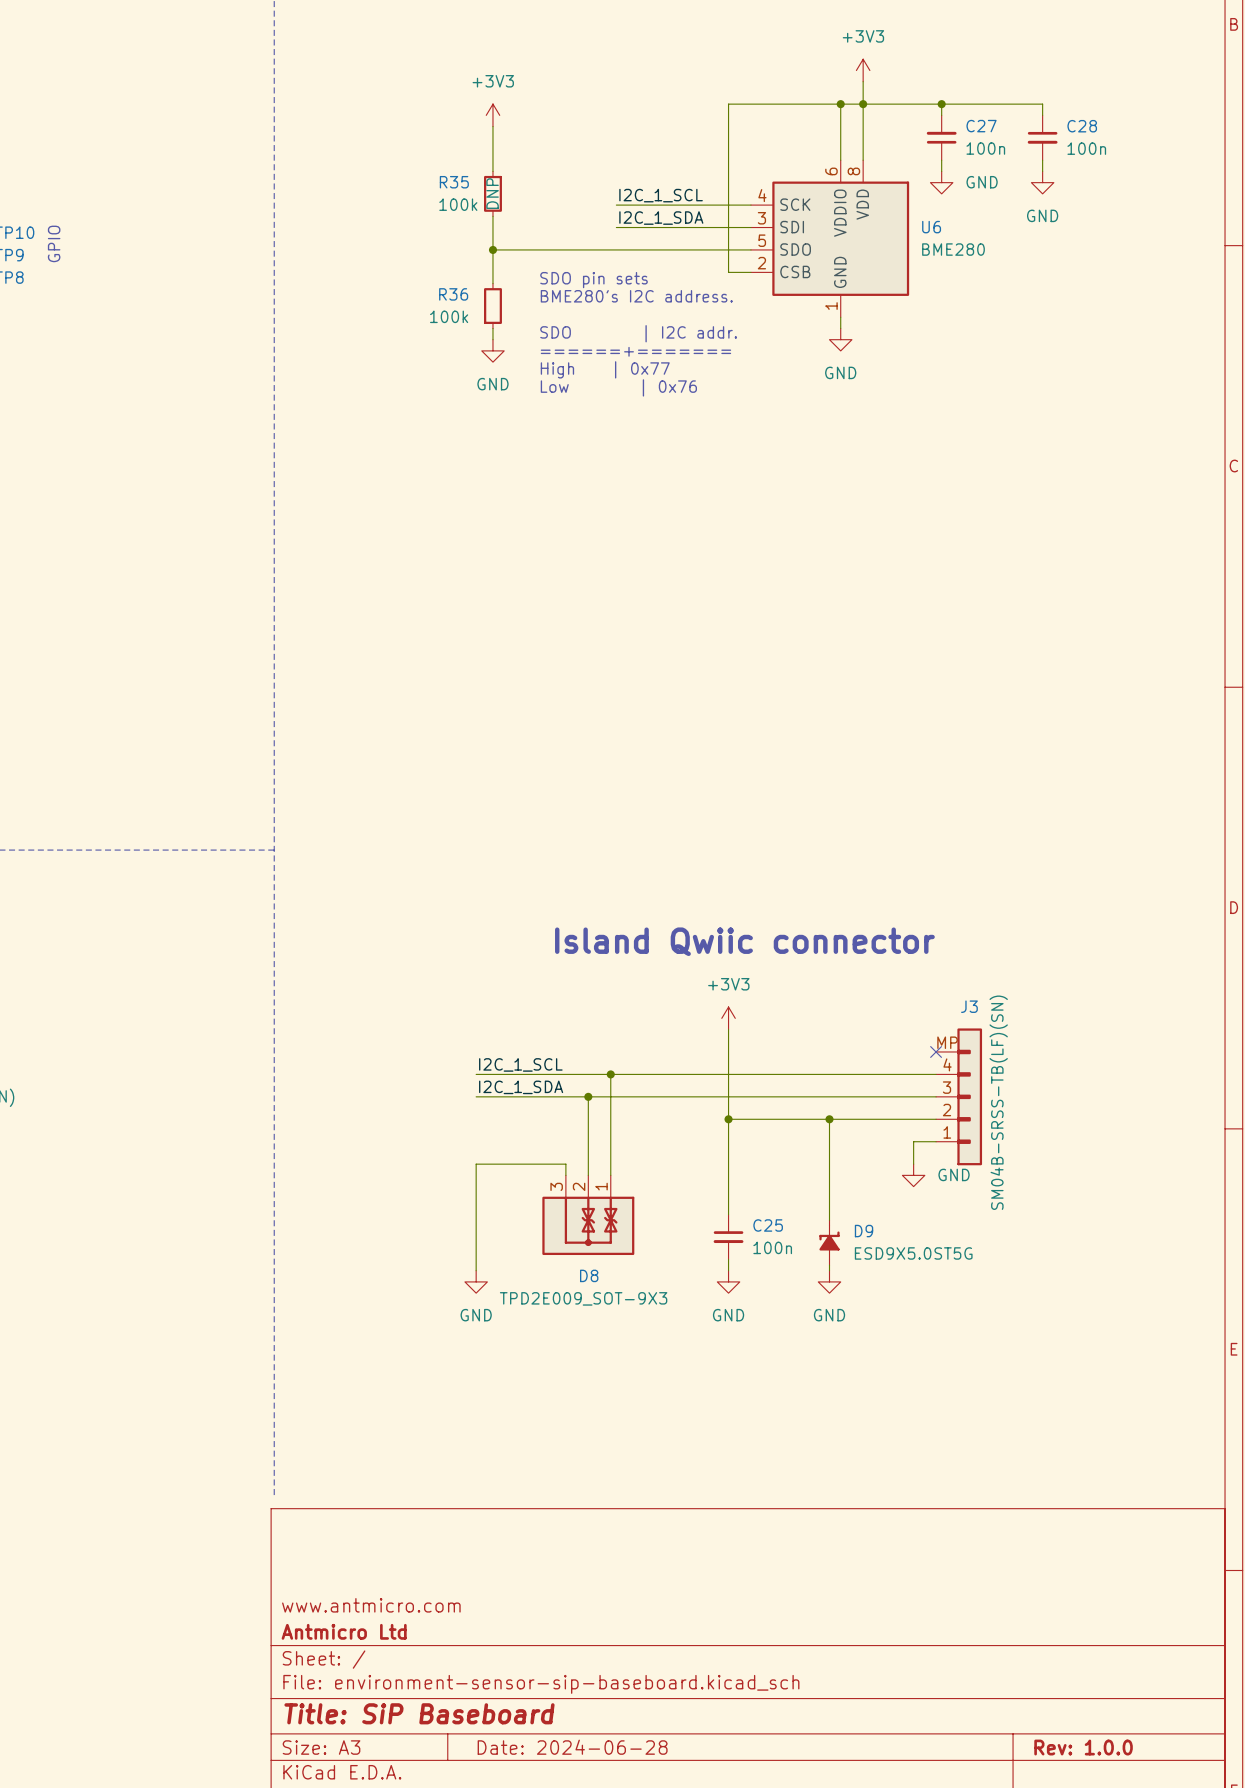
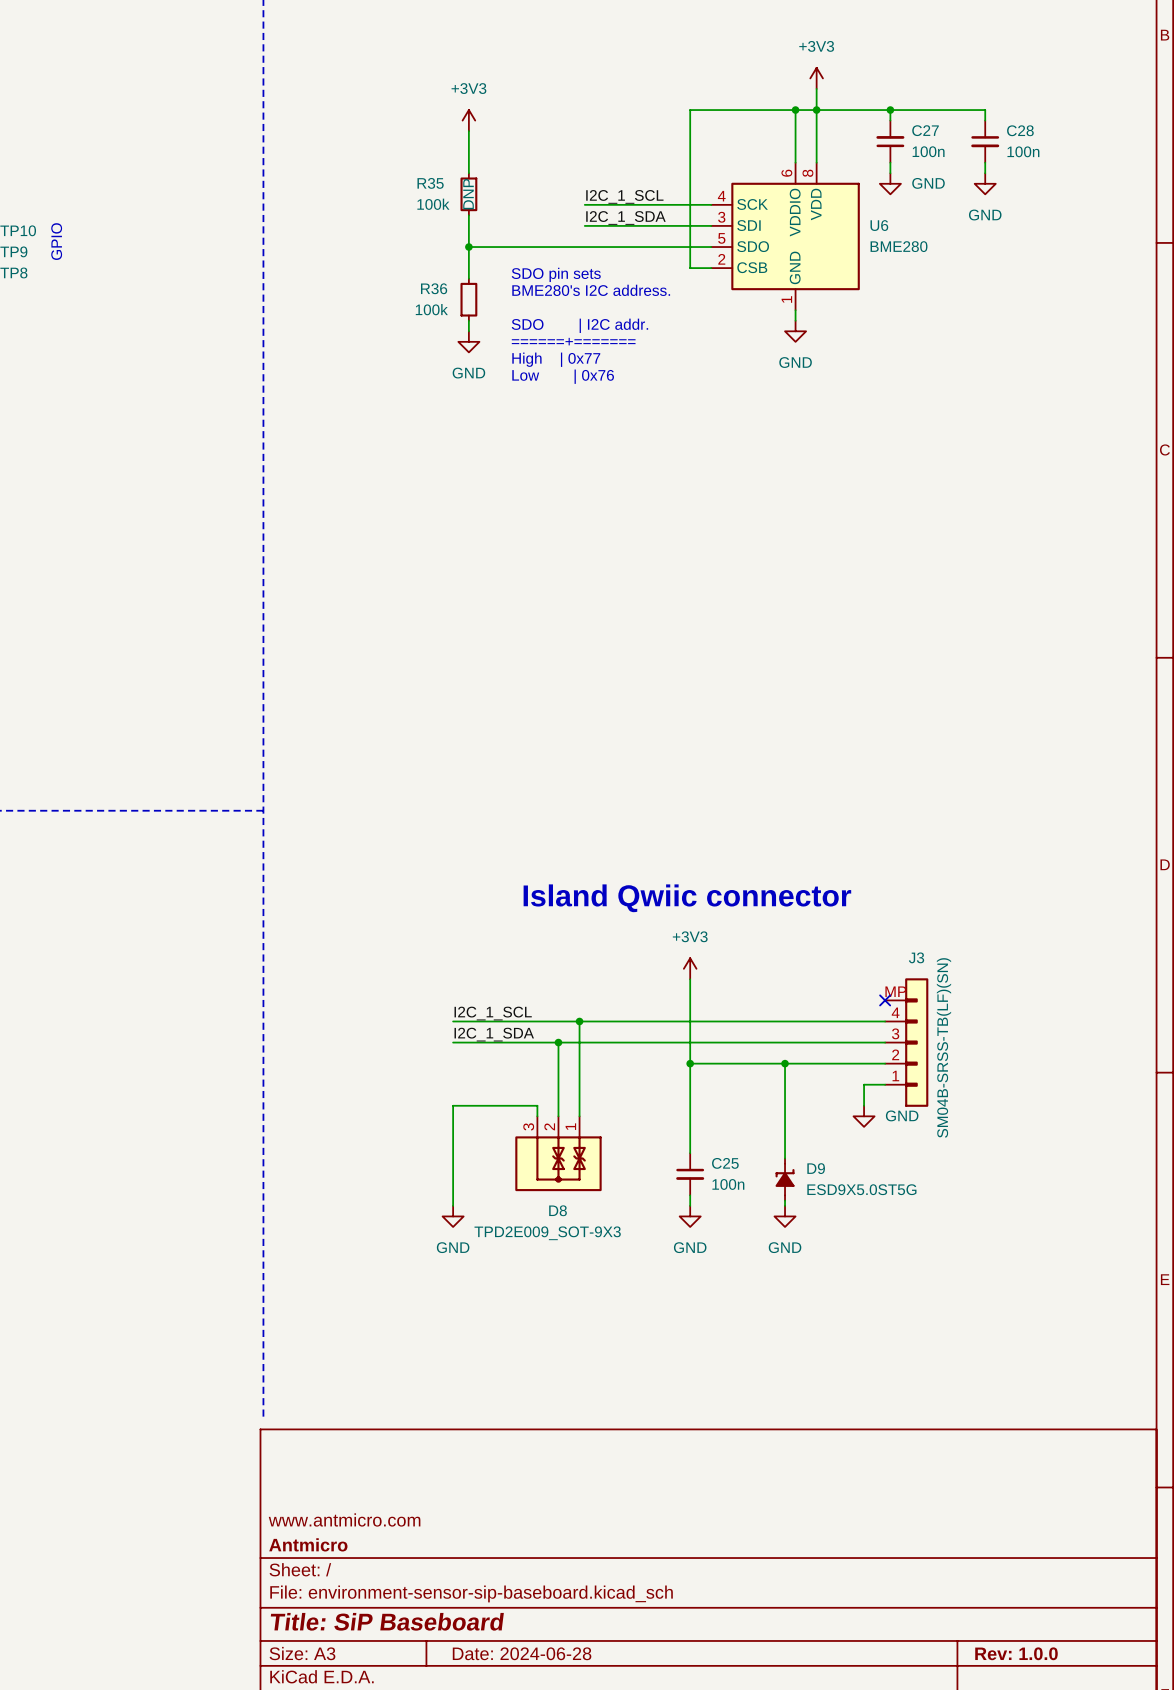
title block: Antmicro Ltd (344, 1631) -> Antmicro (308, 1544)

